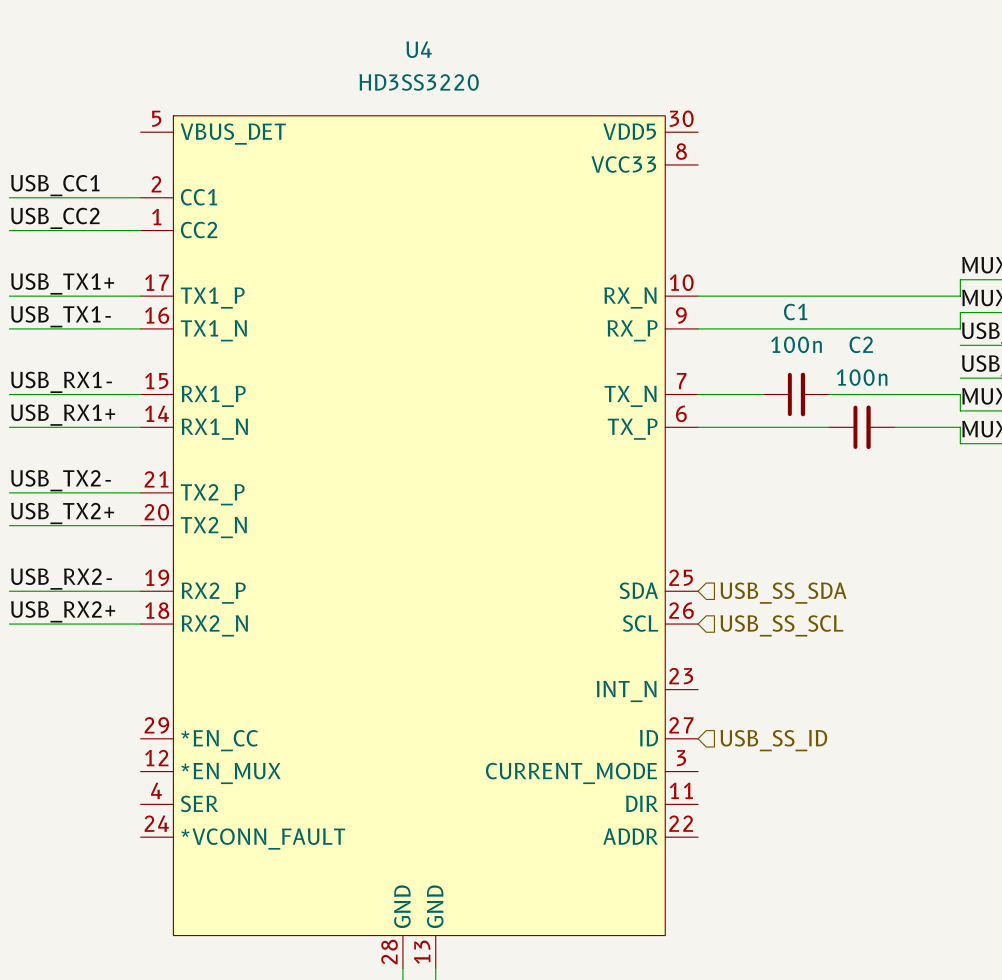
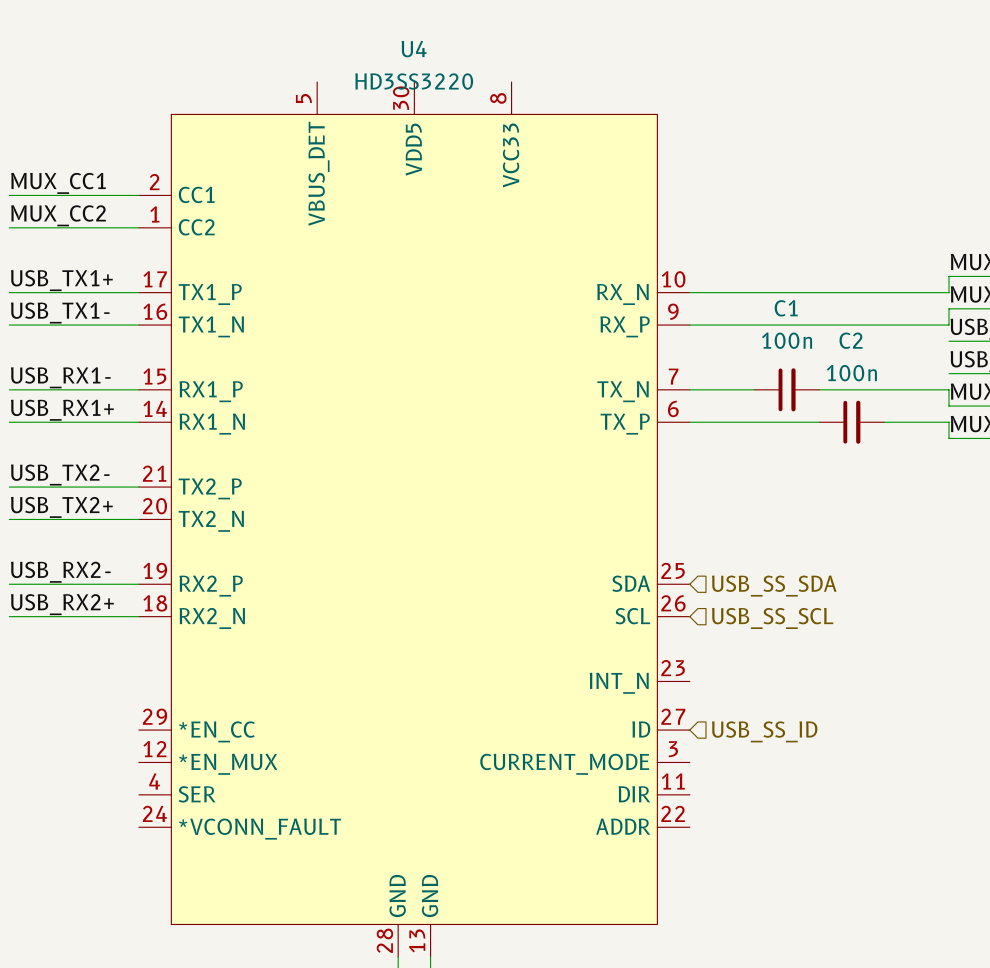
U4 symbol: [140, 115, 699, 969] -> [138, 82, 690, 957]
label: USB_CC1 (55, 185) -> MUX_CC1 (58, 183)
label: USB_CC2 (55, 218) -> MUX_CC2 (58, 215)

